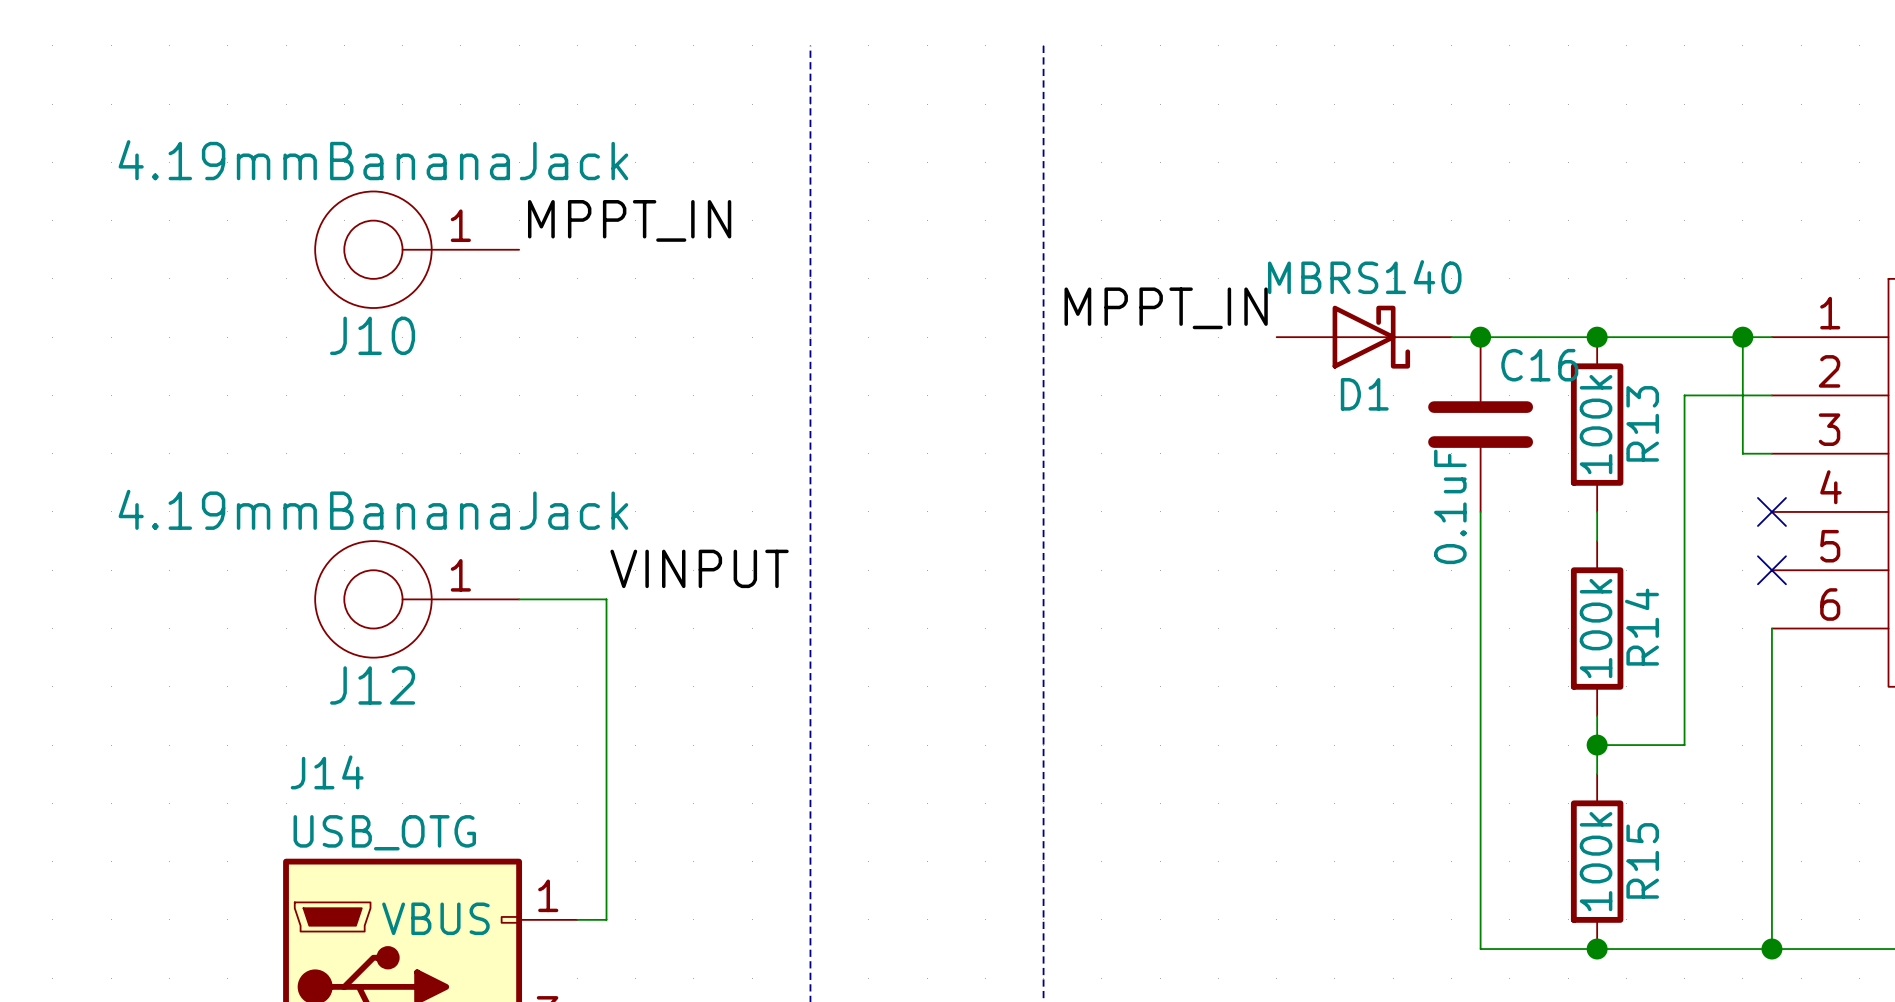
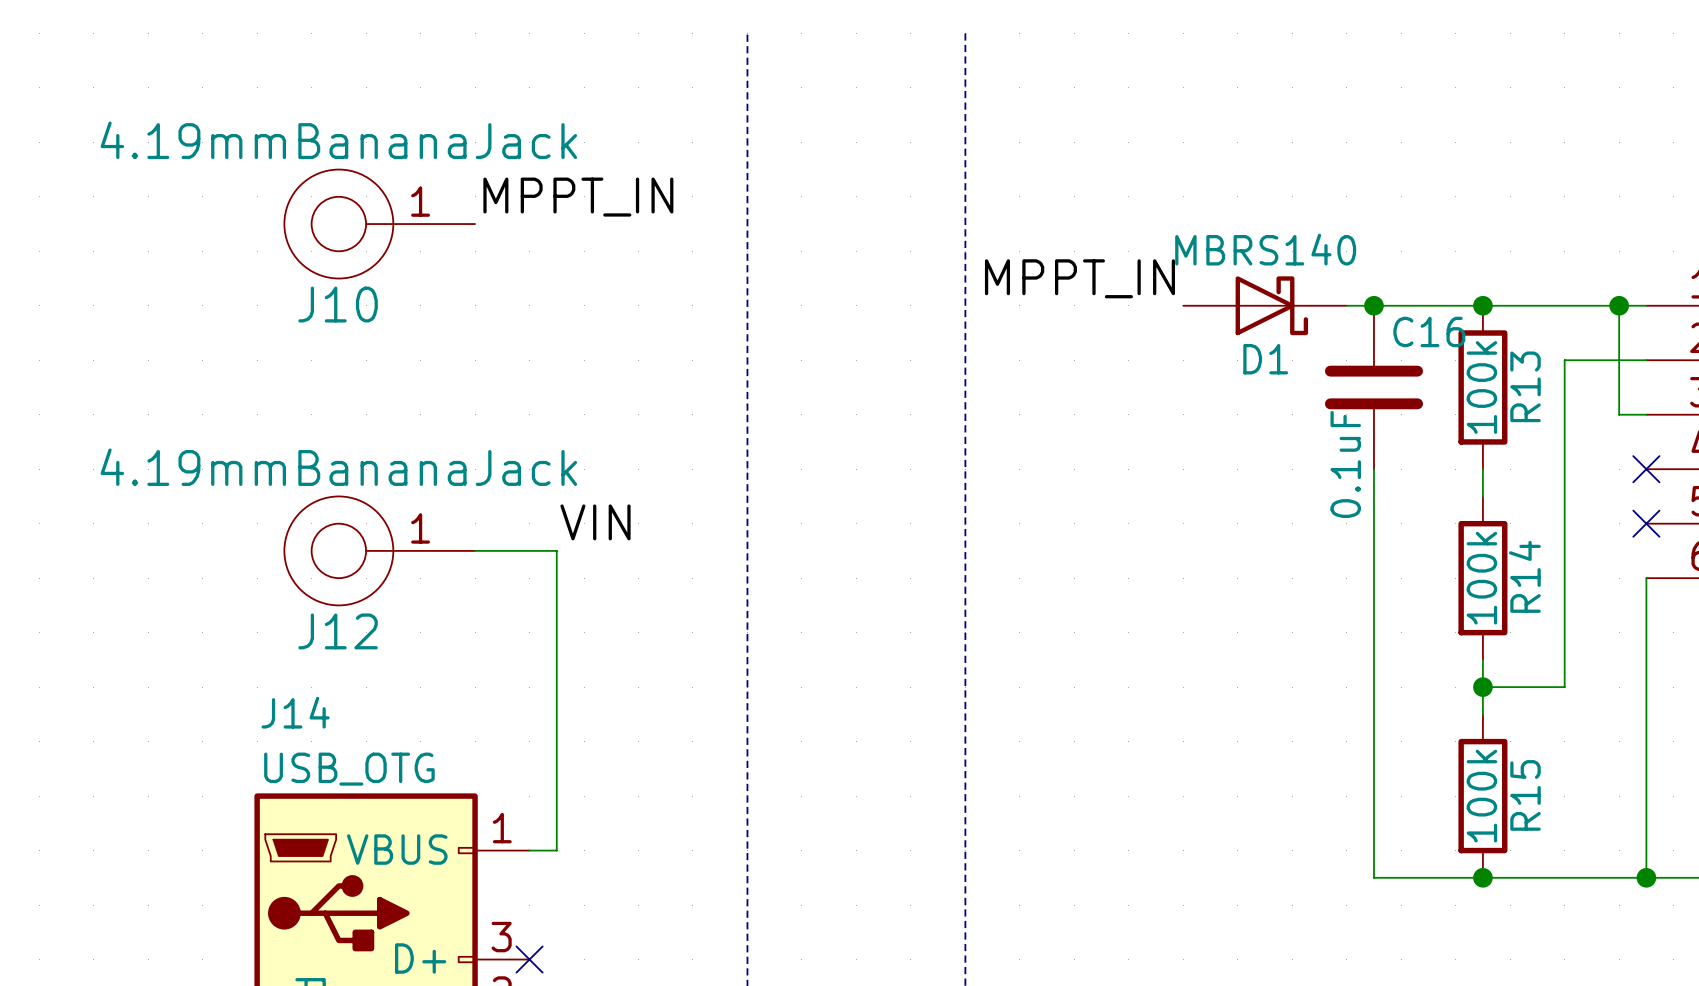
label: VINPUT (699, 568) -> VIN (595, 522)

